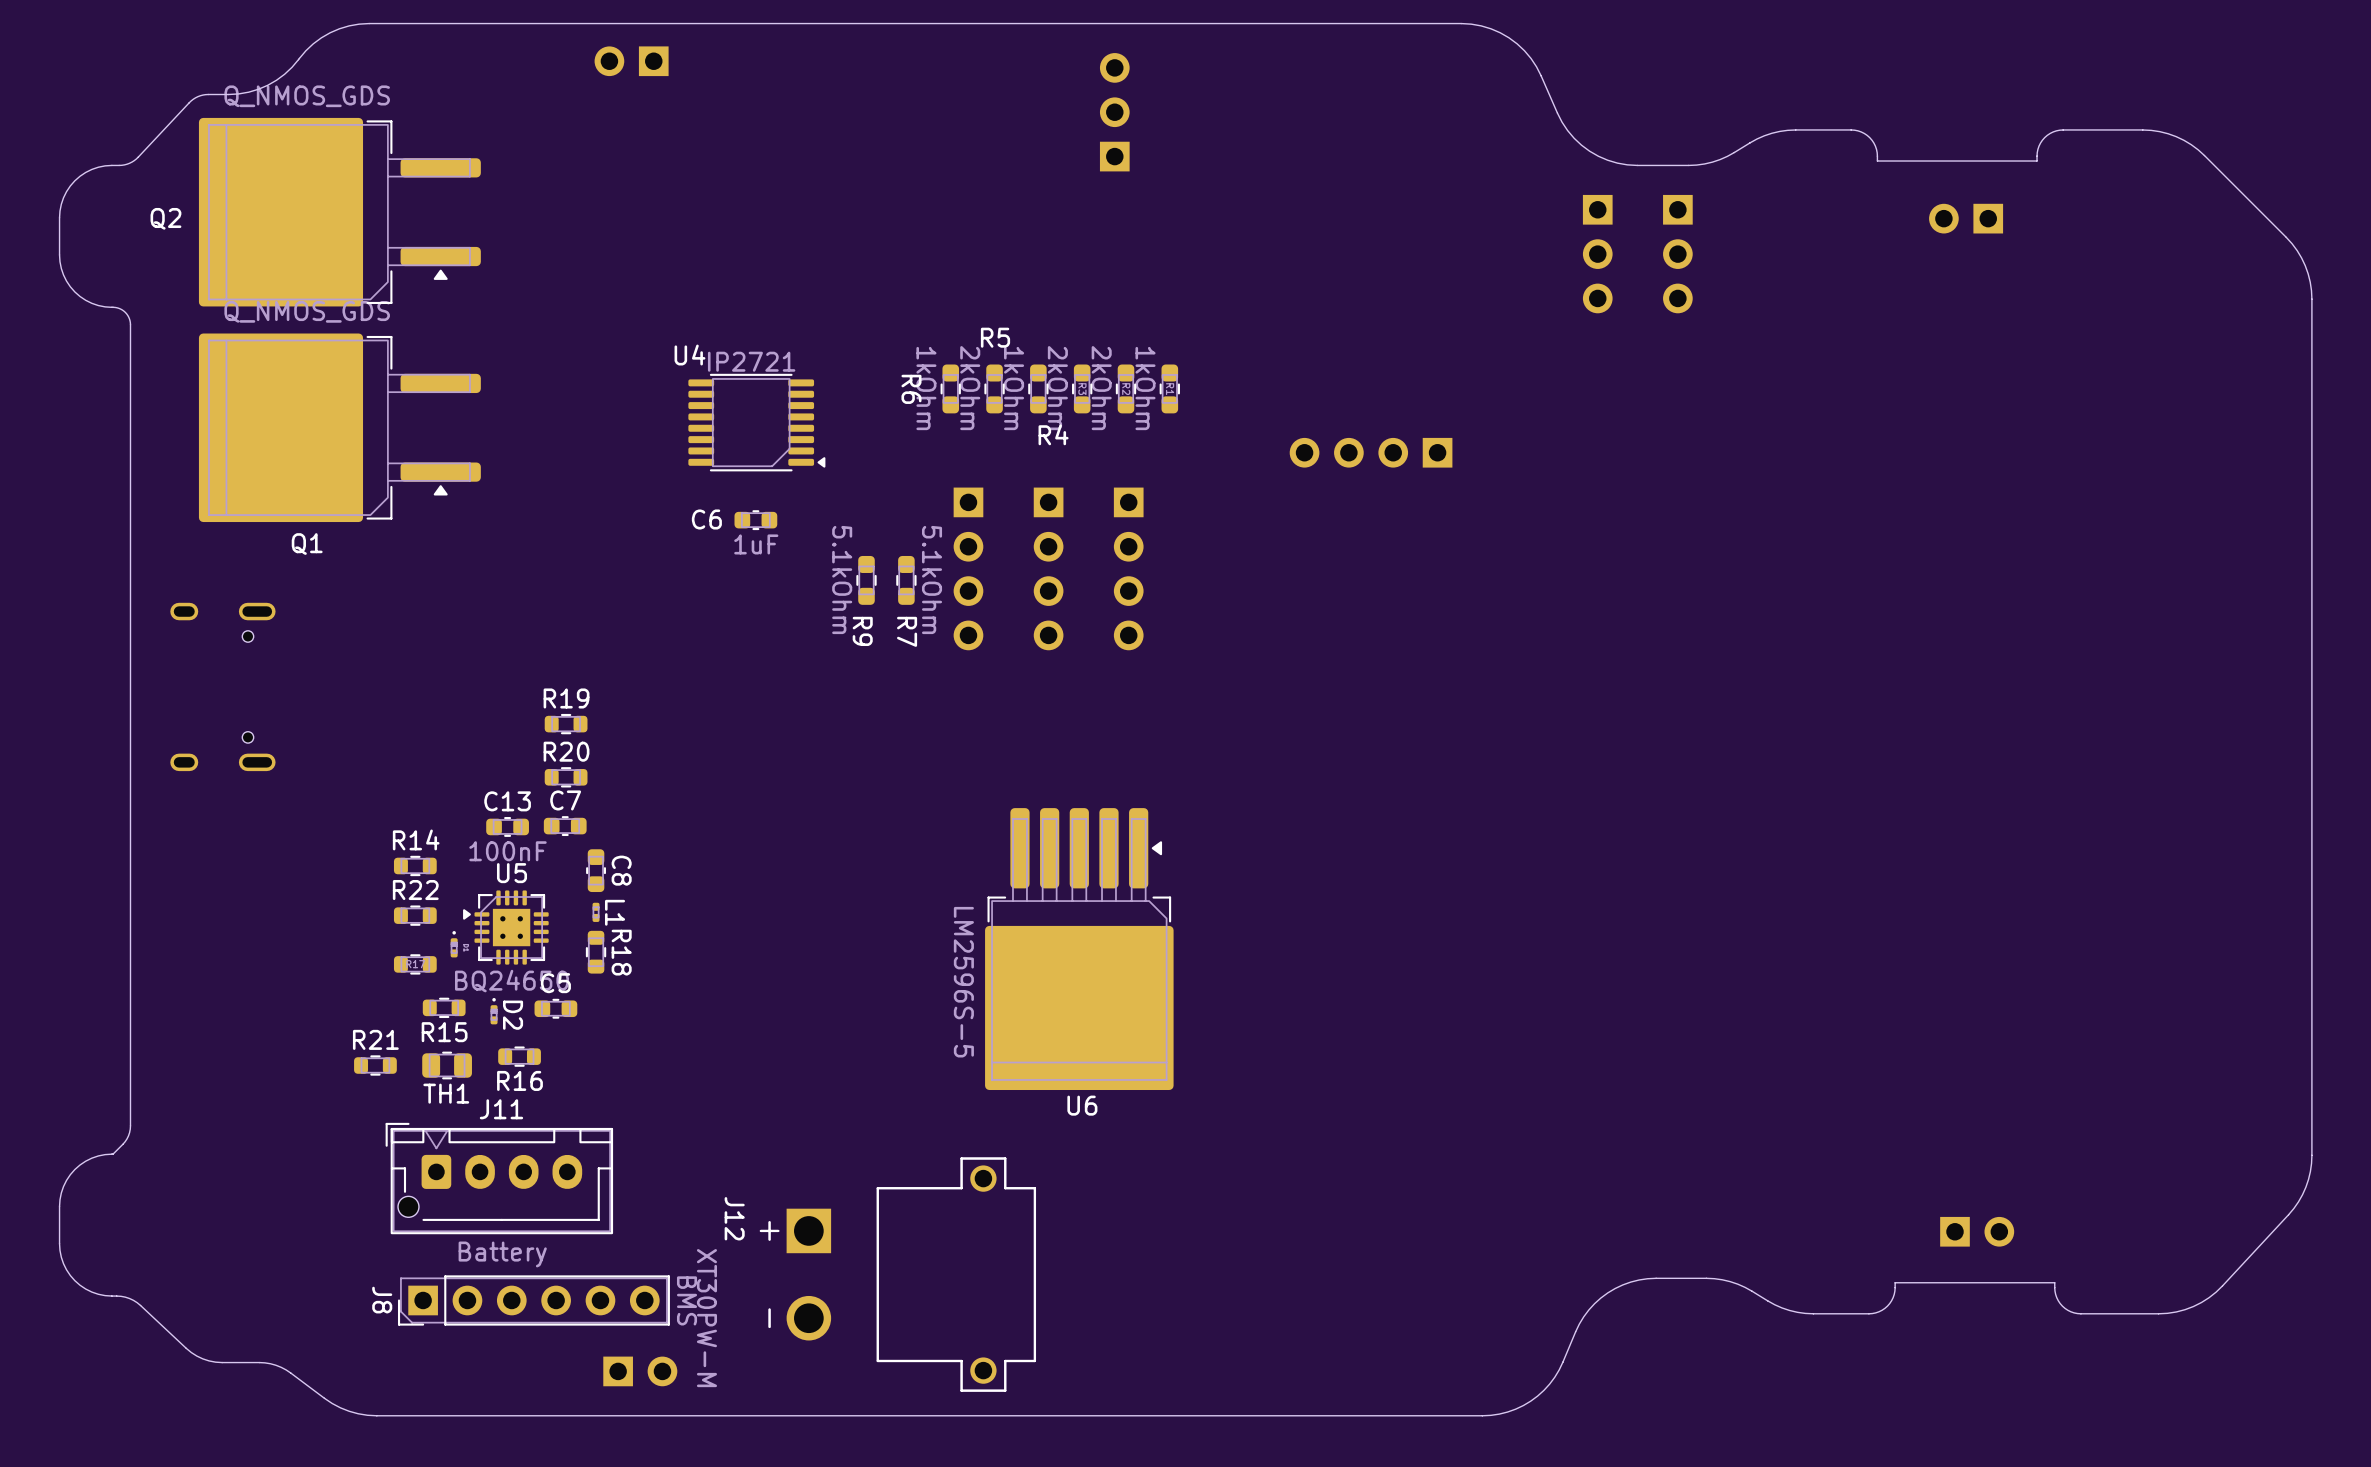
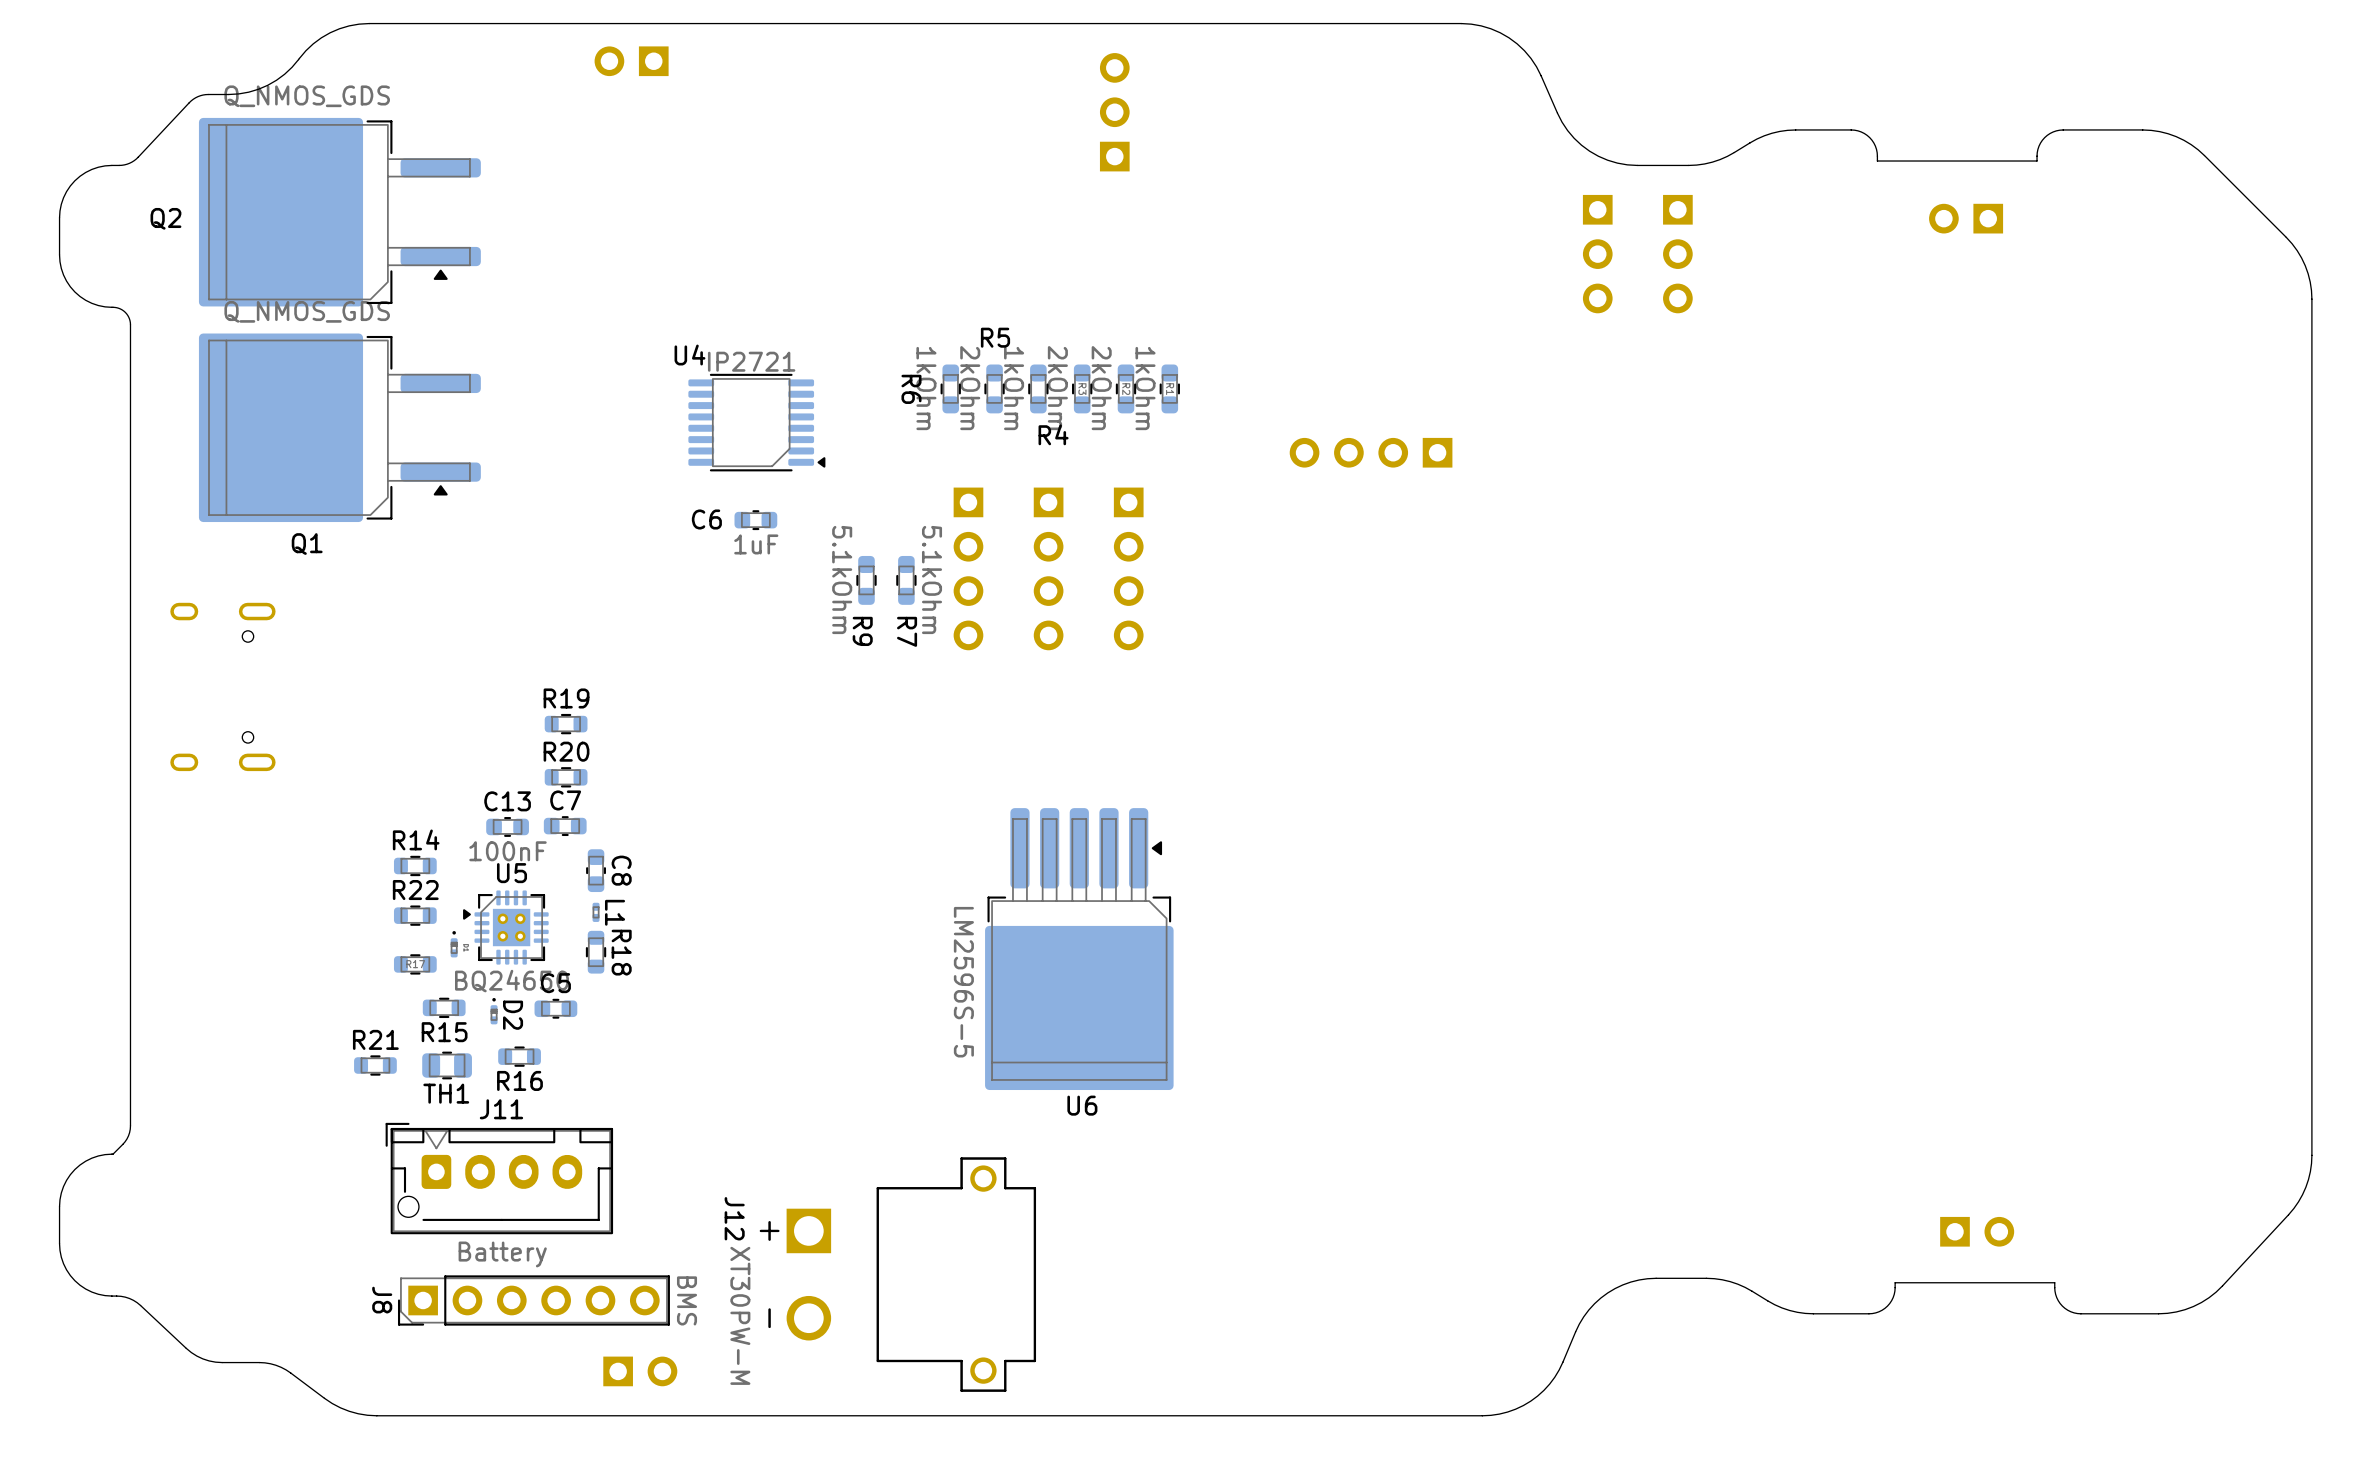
J12 value position: XT30PW-M (706, 1318) -> XT30PW-M (740, 1315)

